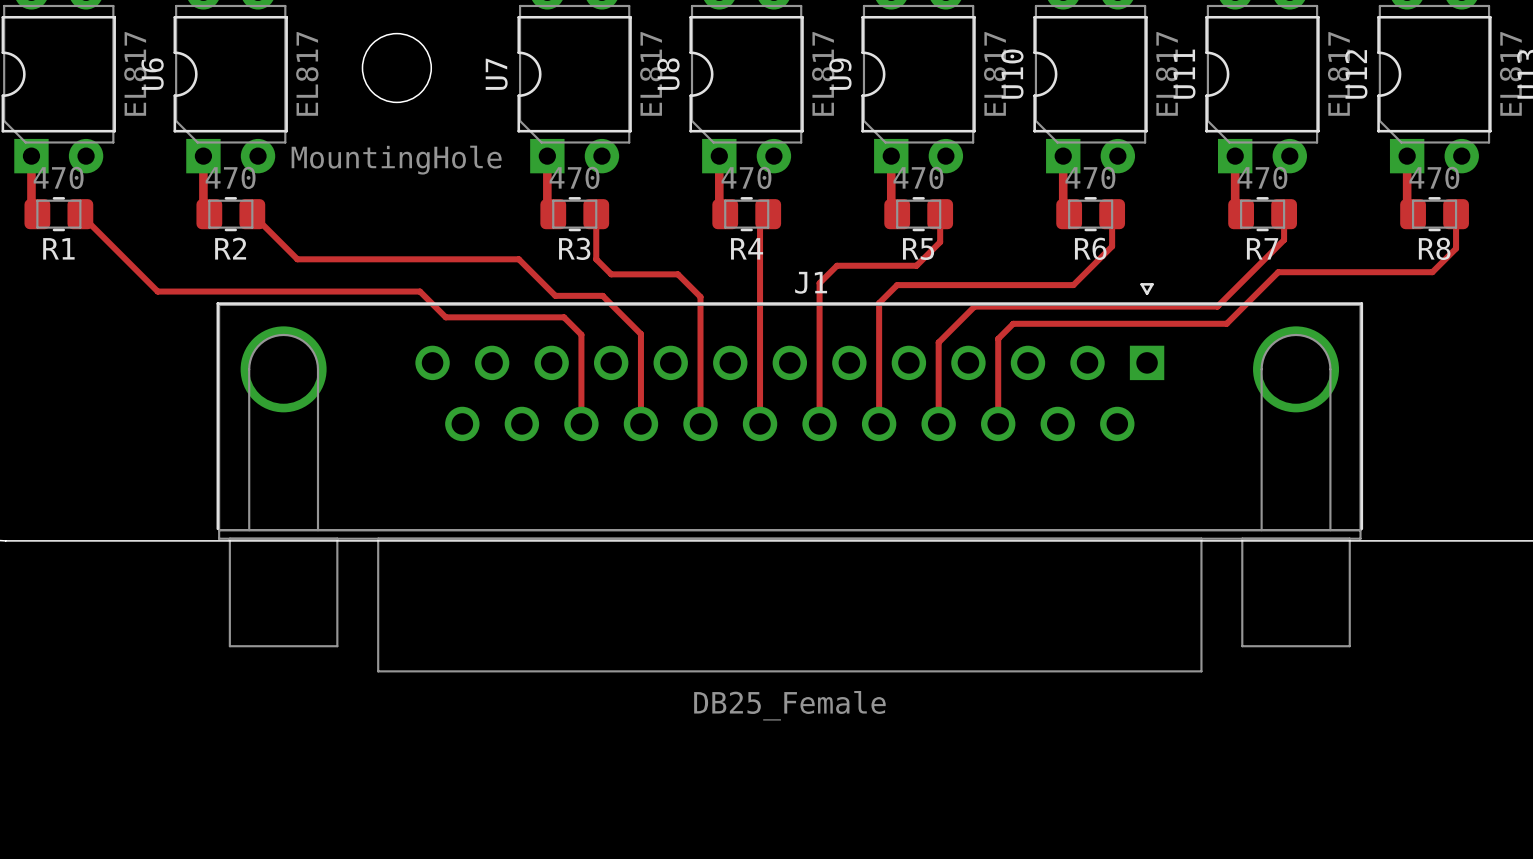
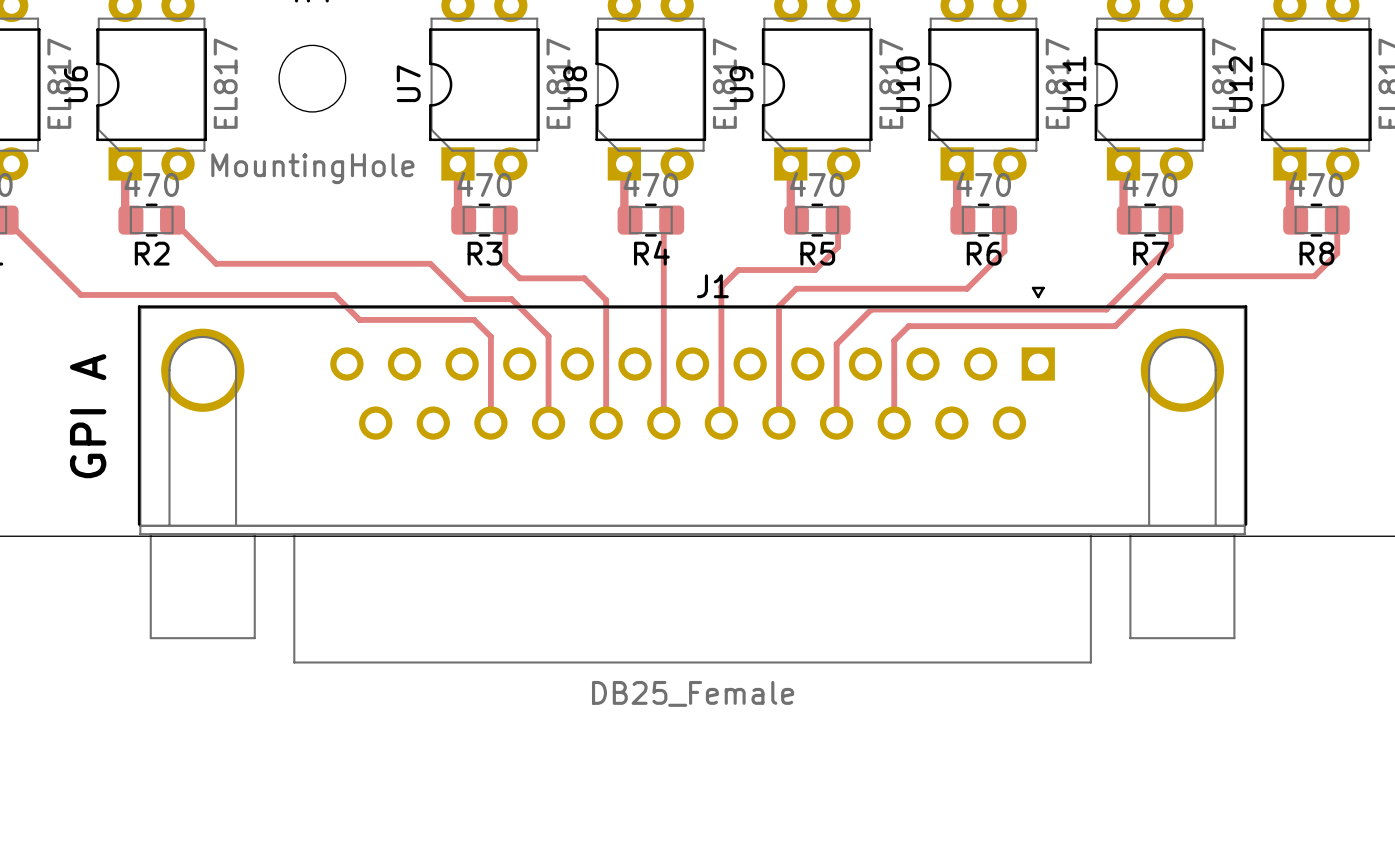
text: none -> GPI A (88, 416)

